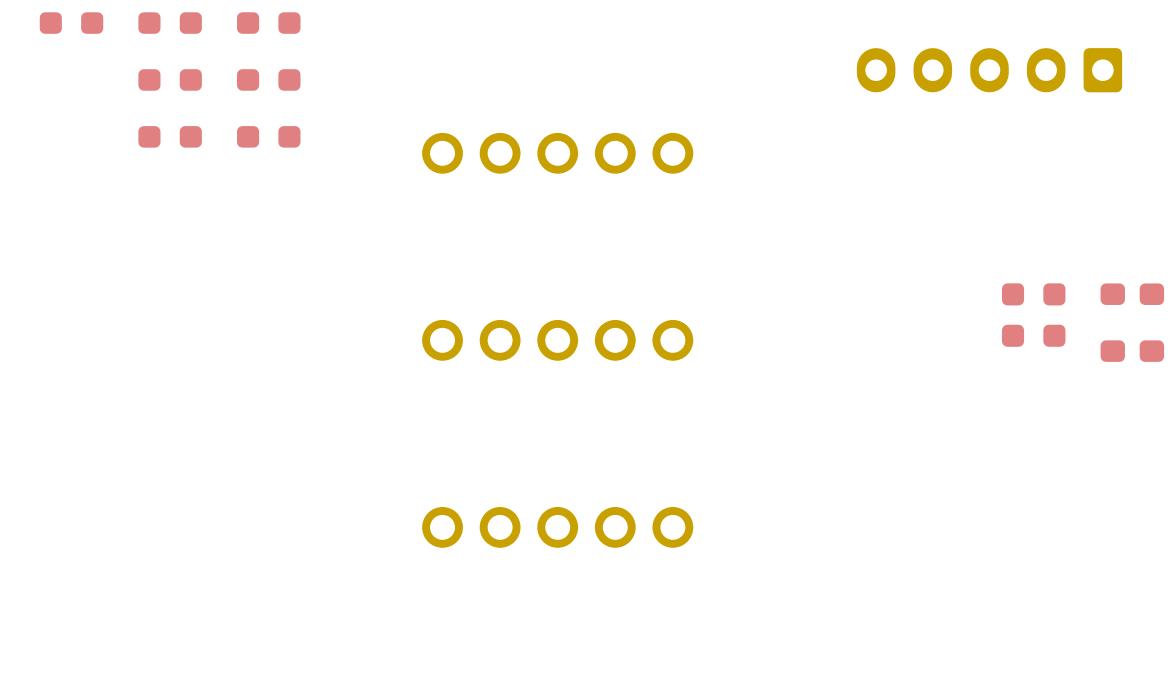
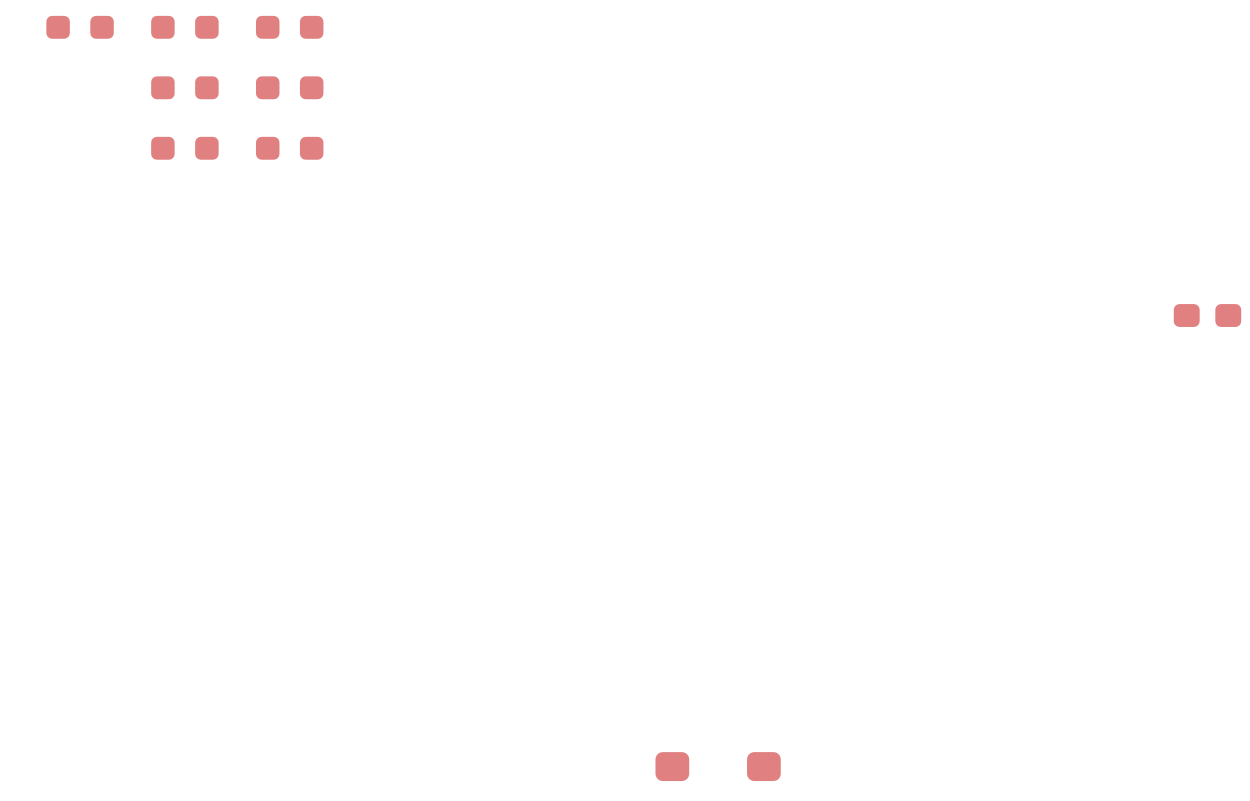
part: (989, 70) -> none
part: (557, 153) -> none
part: (1033, 315) -> none
part: (557, 340) -> none
part: (1132, 351) -> none
part: (557, 527) -> none

